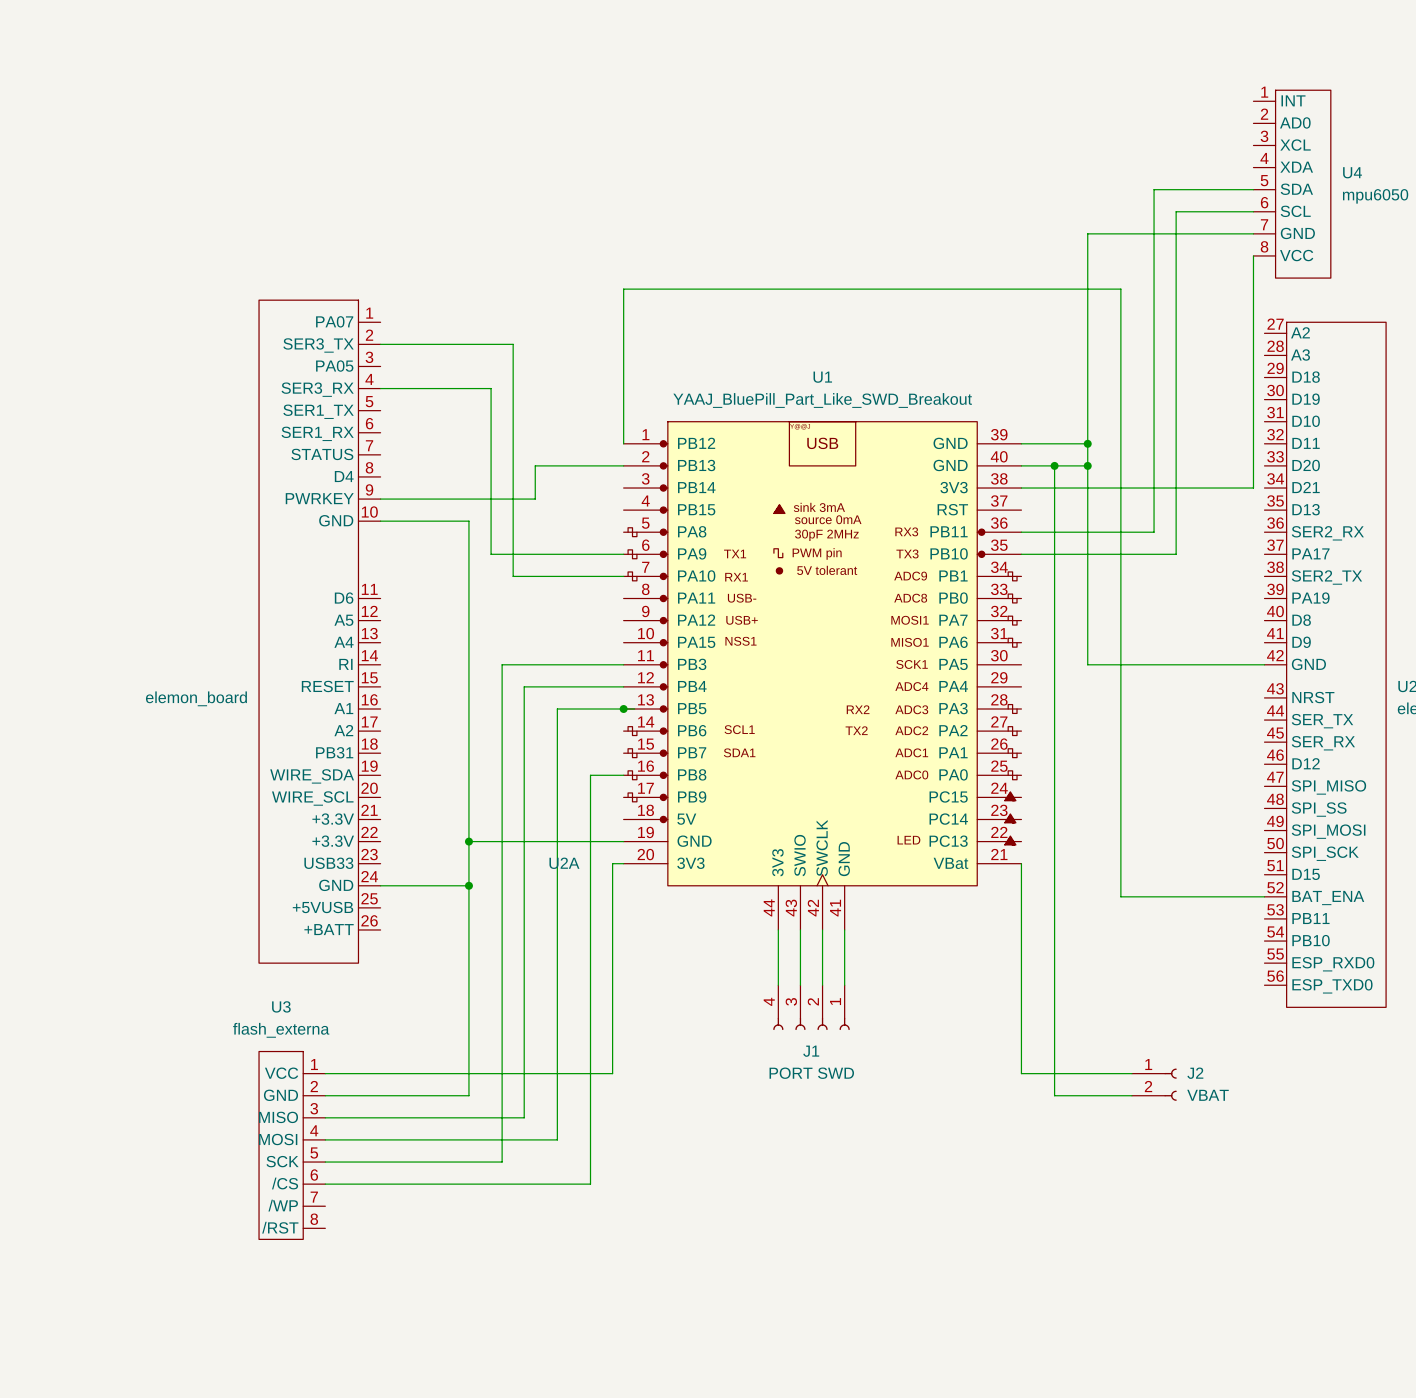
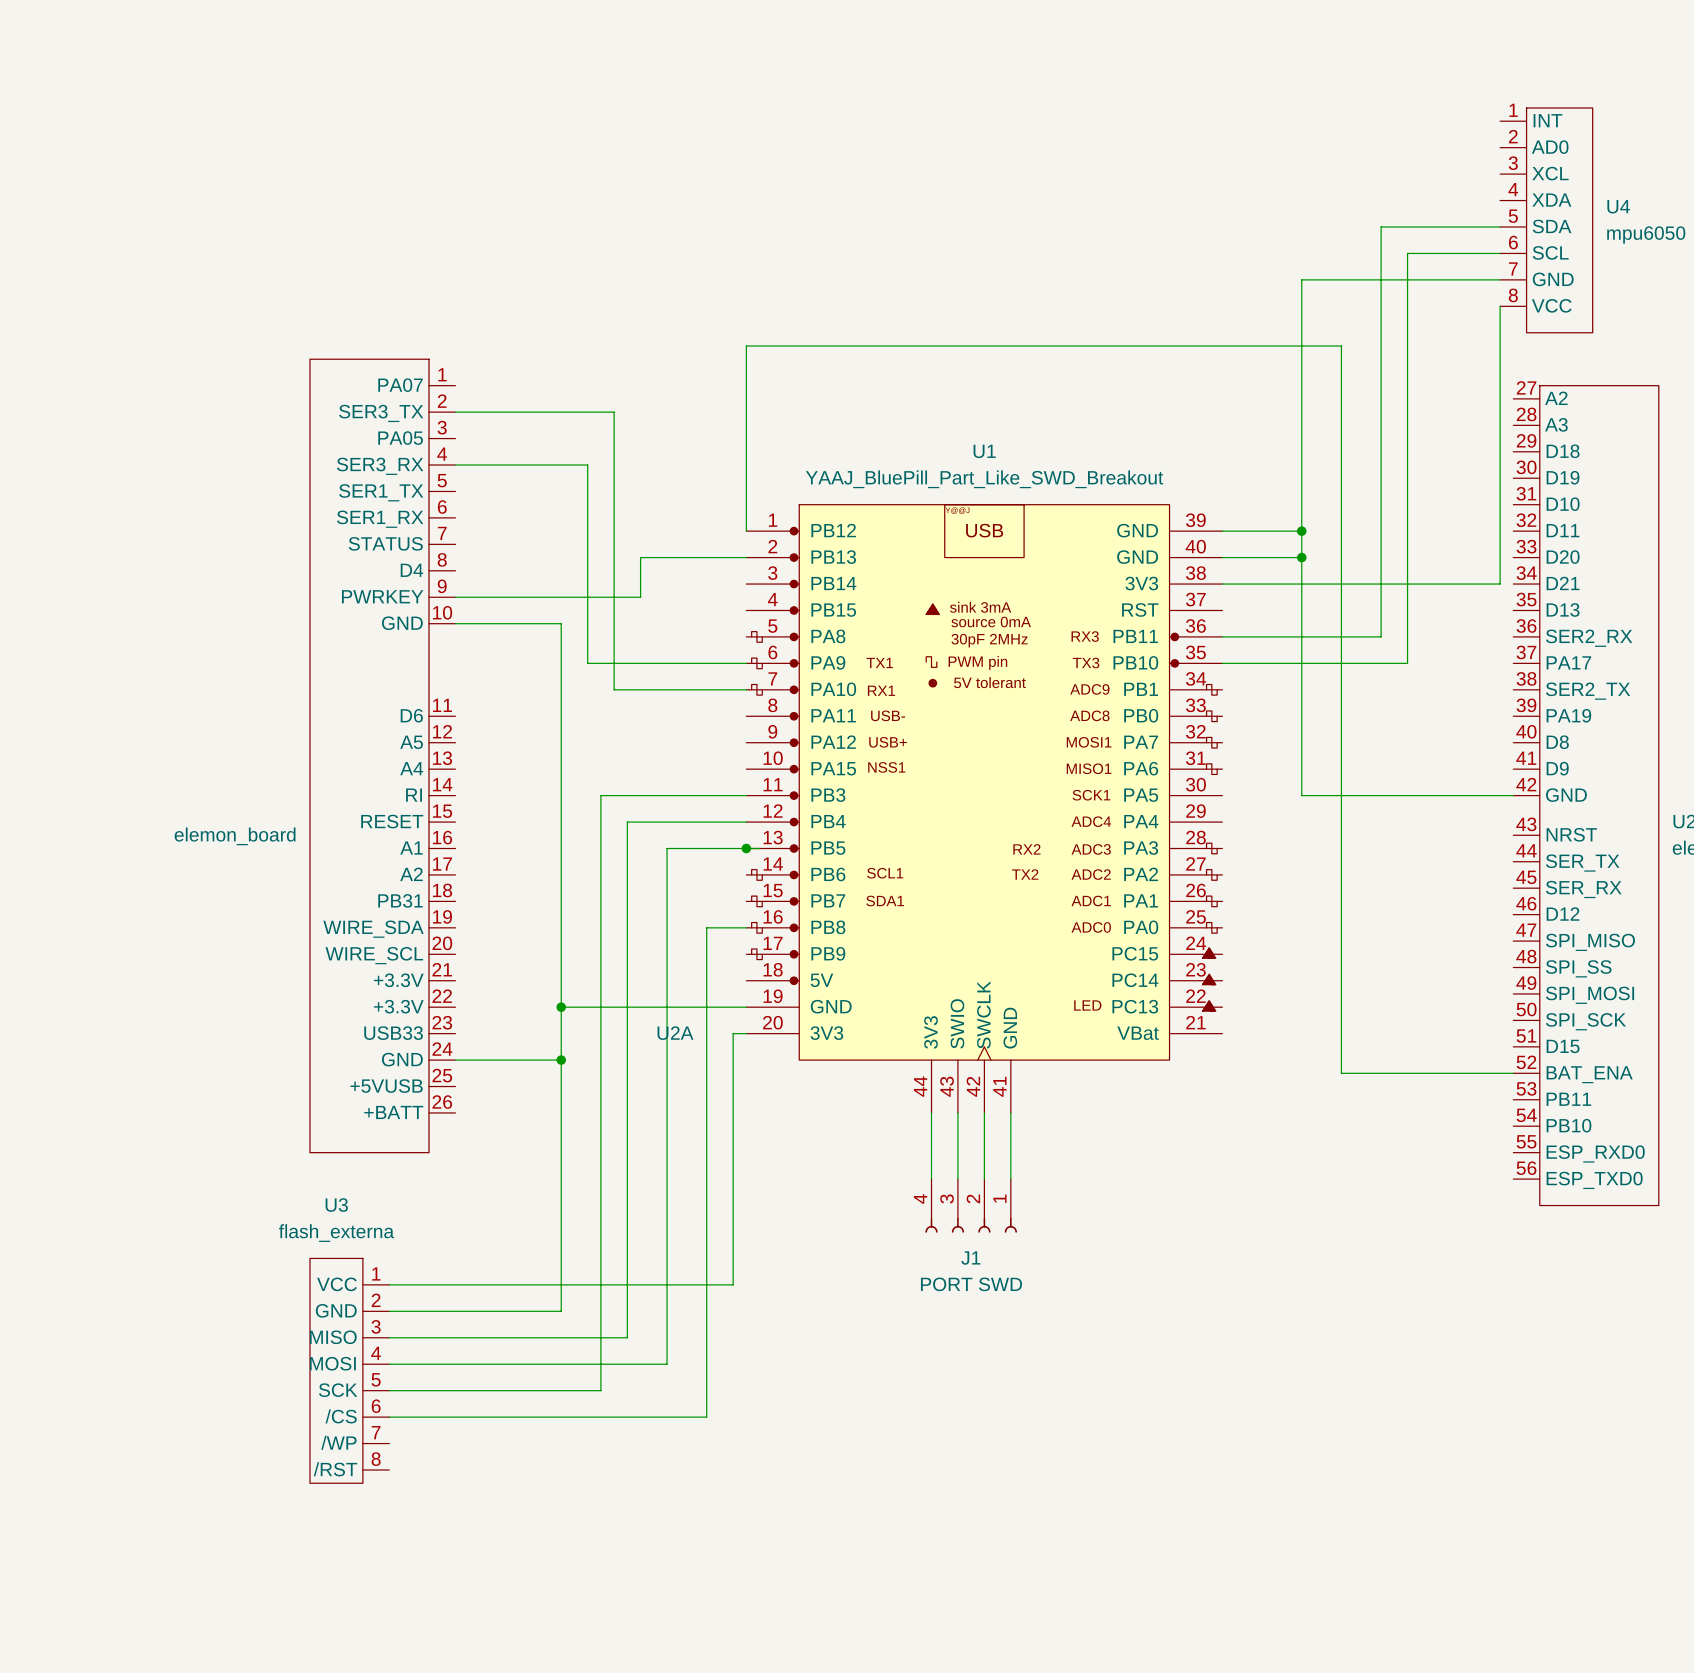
wire: (1054, 465) (1054, 1095) (1131, 1095) -> none
junction: (1054, 465) -> none
wire: (1021, 863) (1021, 1073) (1131, 1073) -> none
J2: VBAT (1154, 1084) -> none

